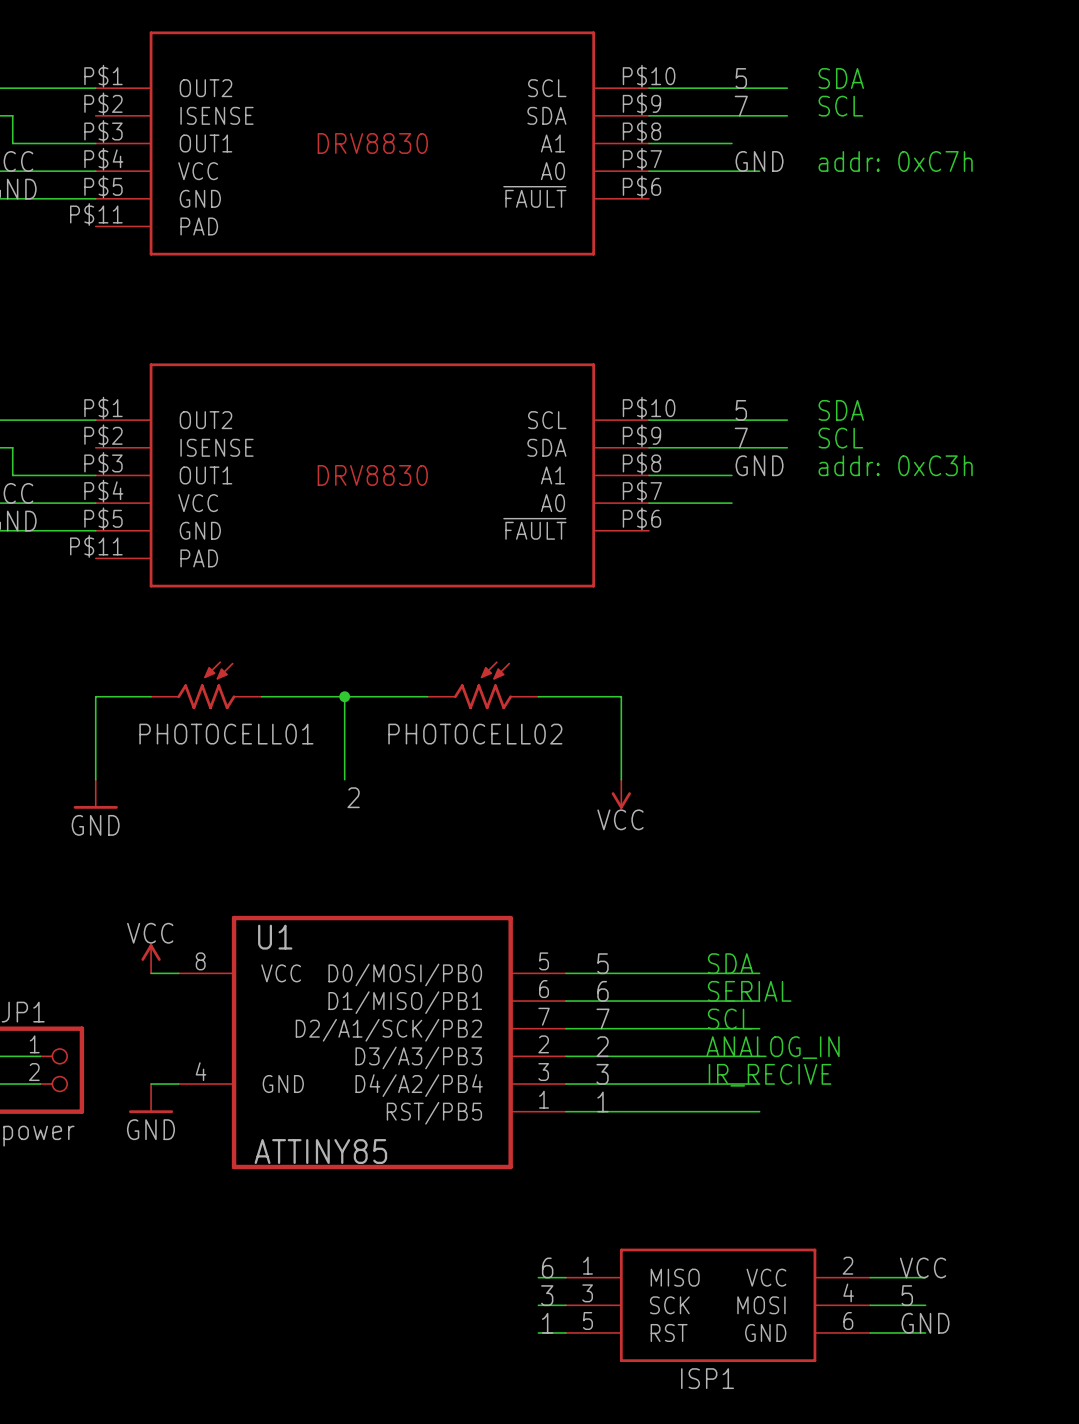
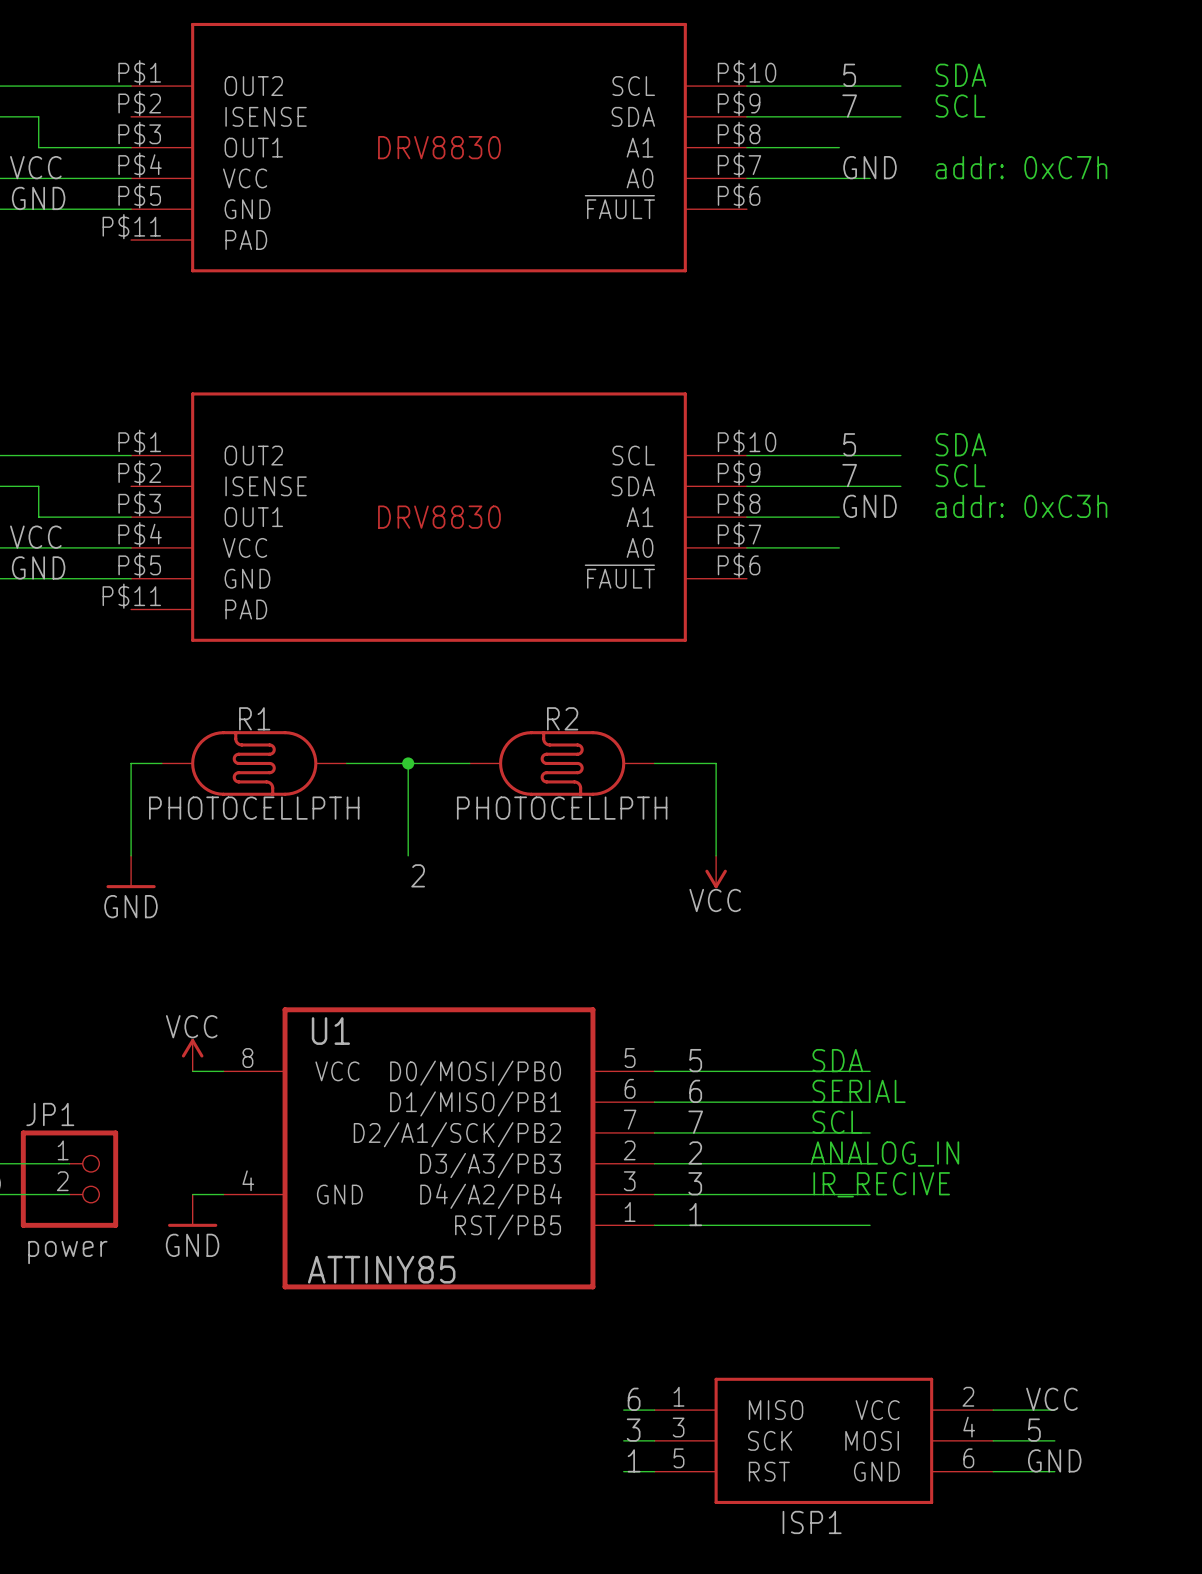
PHOTOCELL01: (206, 685) -> none
PHOTOCELL02: (483, 685) -> none
R1: none -> PHOTOCELLPTH (254, 763)
R2: none -> PHOTOCELLPTH (562, 763)

